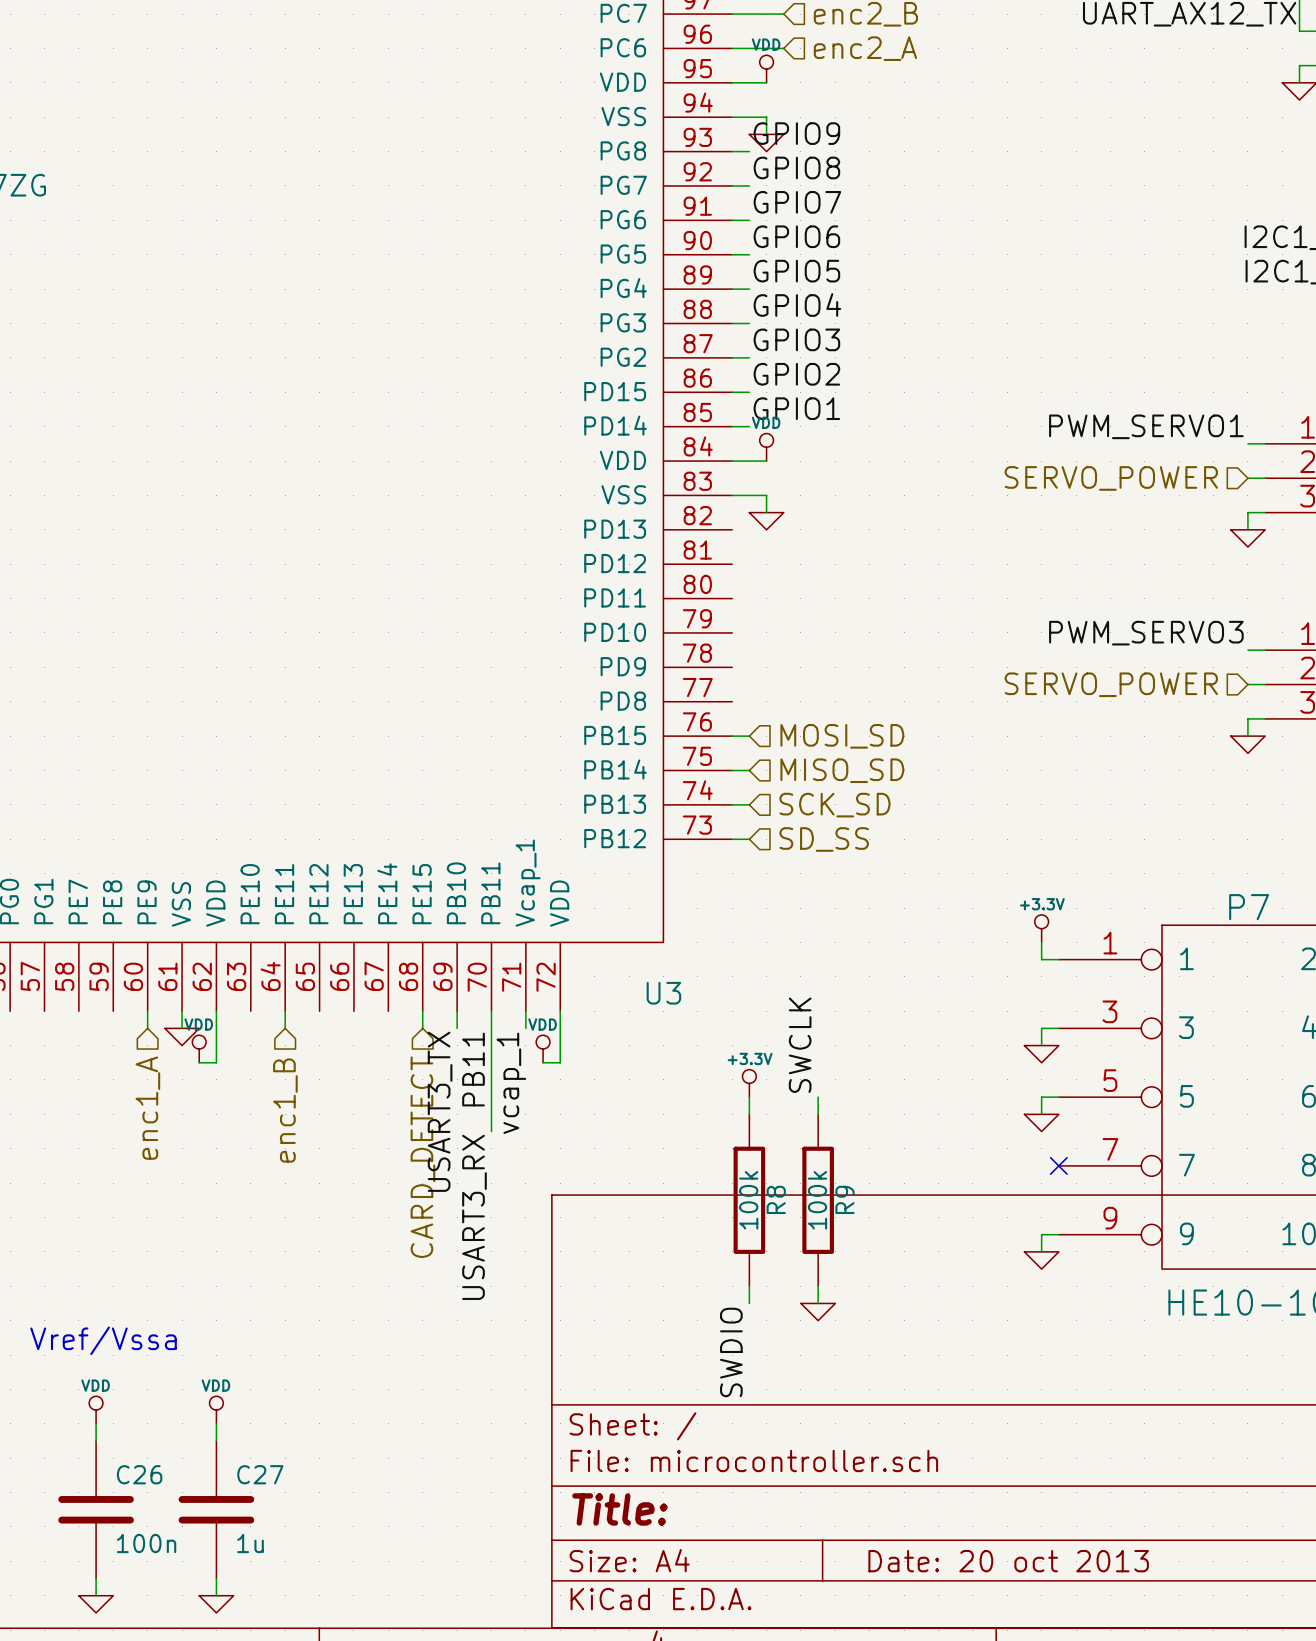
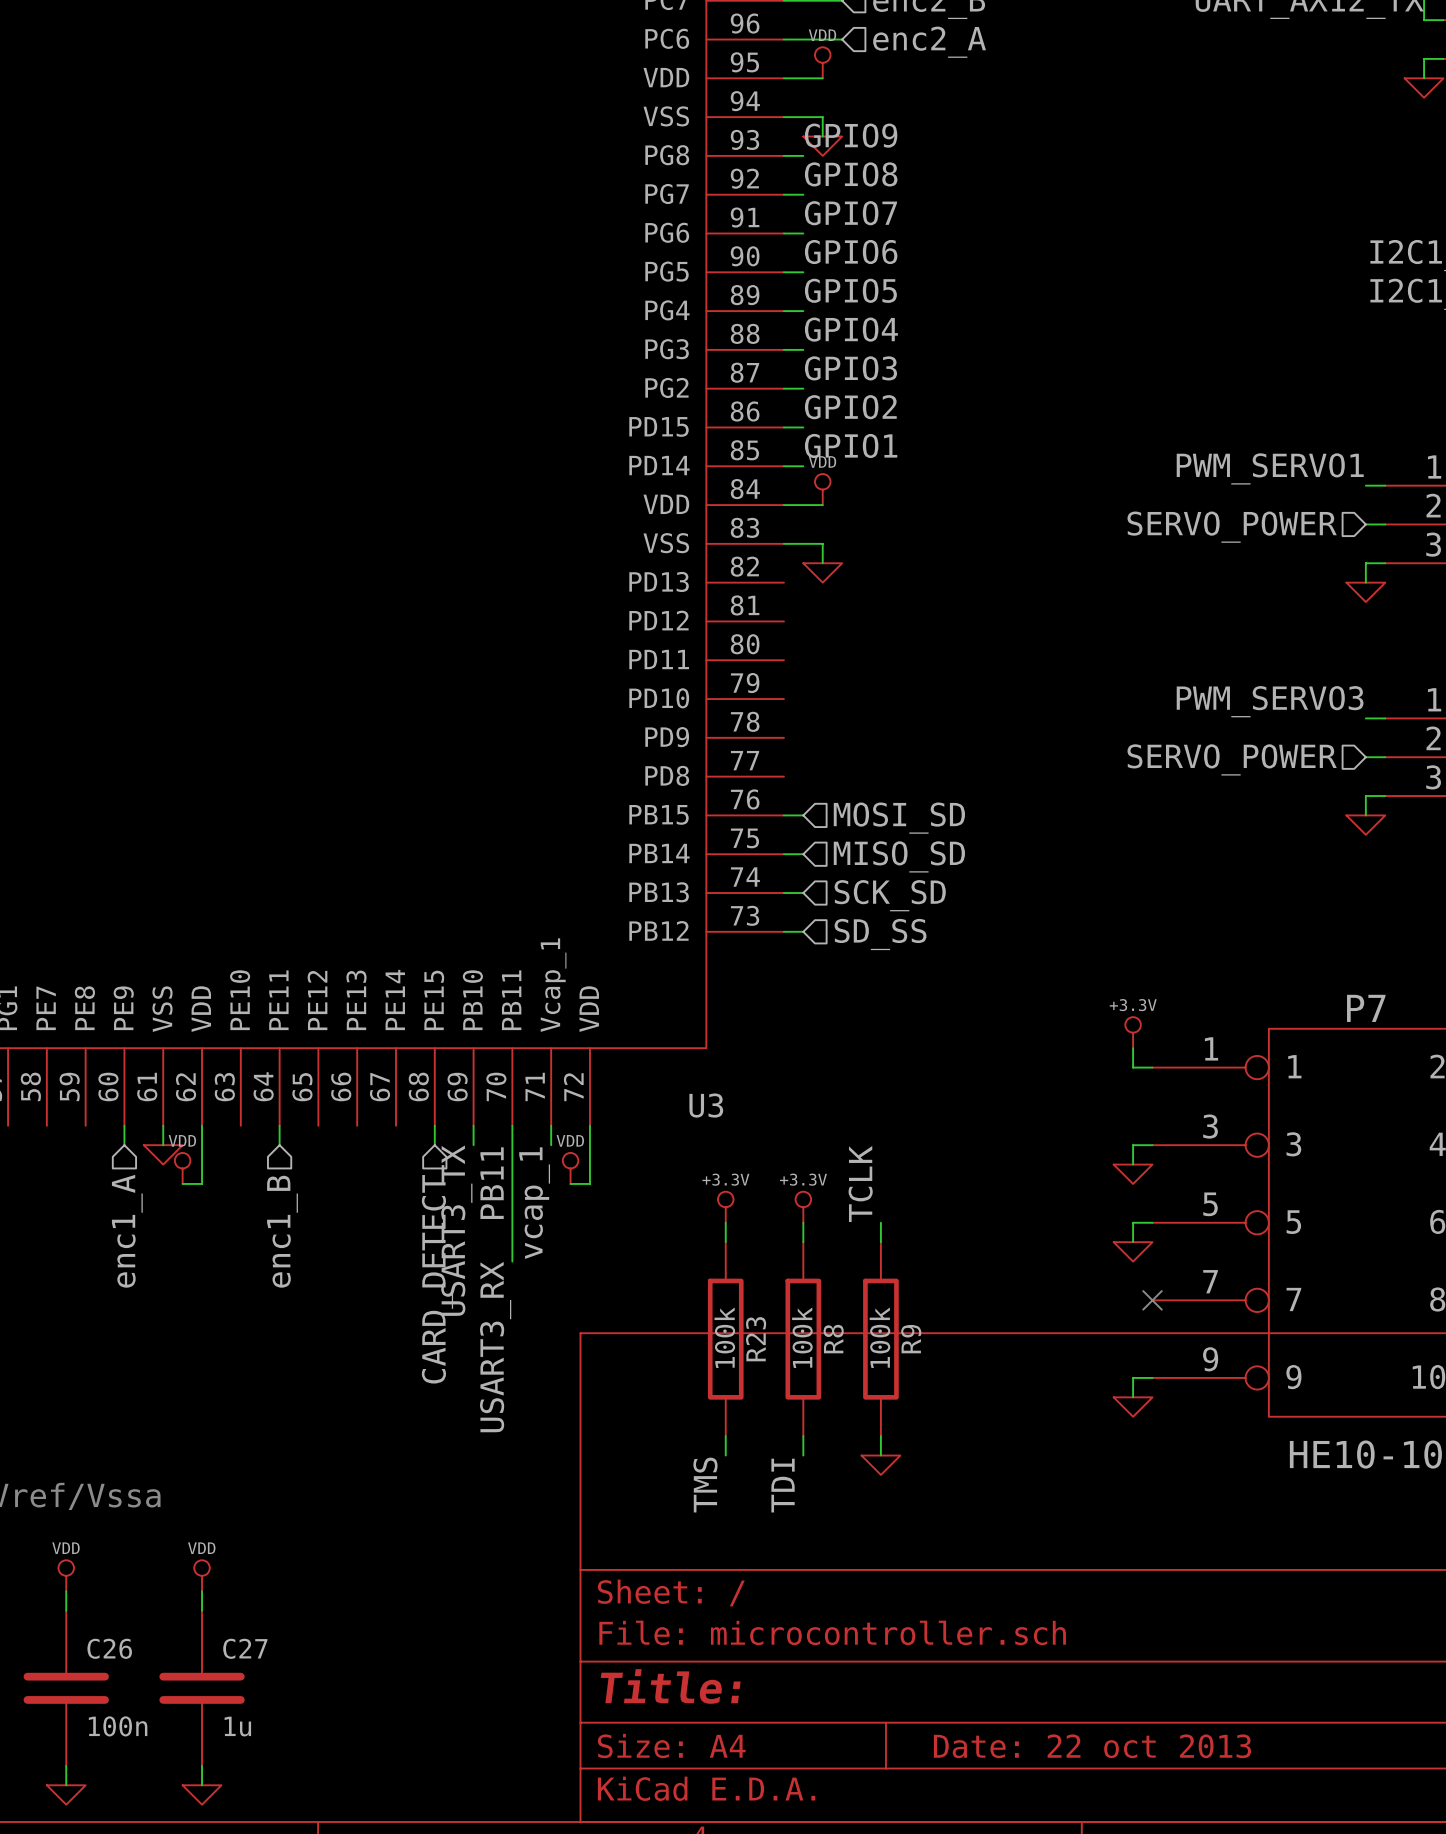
label: SWCLK (800, 1045) -> TCLK (860, 1184)
power symbol: none -> +3.3V (725, 1207)
wire: none -> (725, 1222) (725, 1242)
R23: none -> 100k (725, 1339)
wire: none -> (725, 1436) (725, 1455)
label: none -> TMS (705, 1485)
label: SWDIO (731, 1352) -> TDI (783, 1485)
title block: Date: 20 oct 2013 (1008, 1561) -> Date: 22 oct 2013 (1092, 1746)

